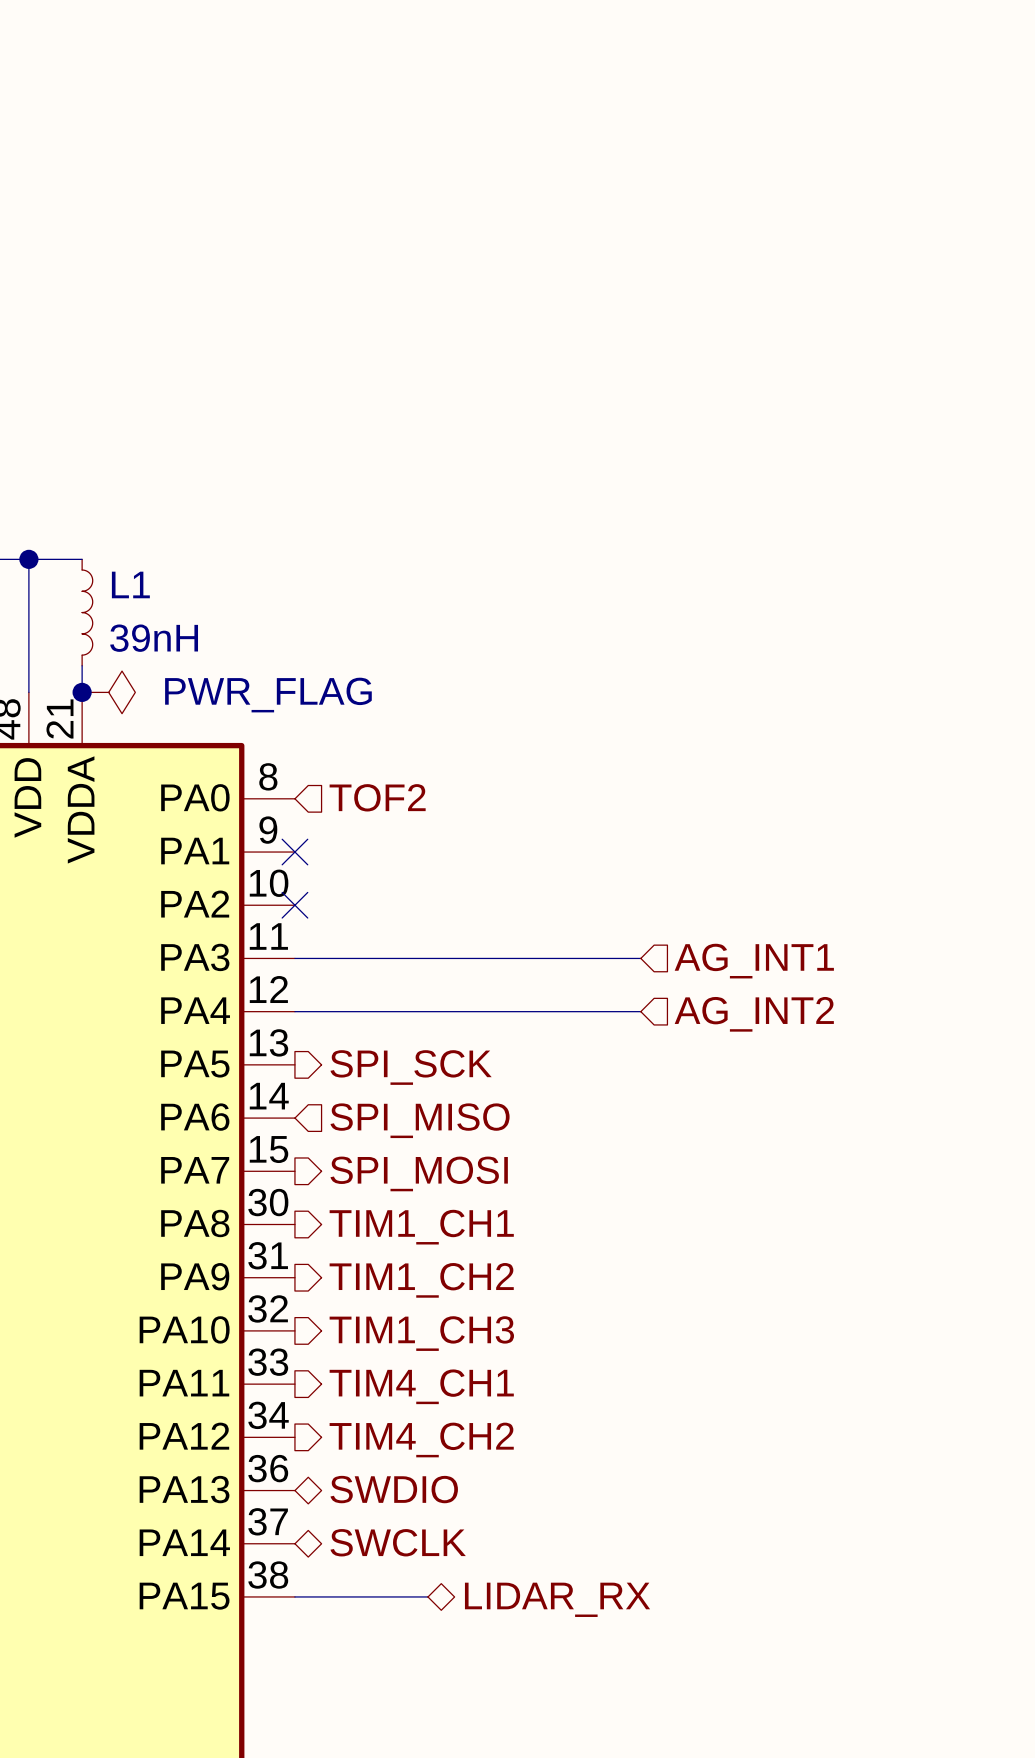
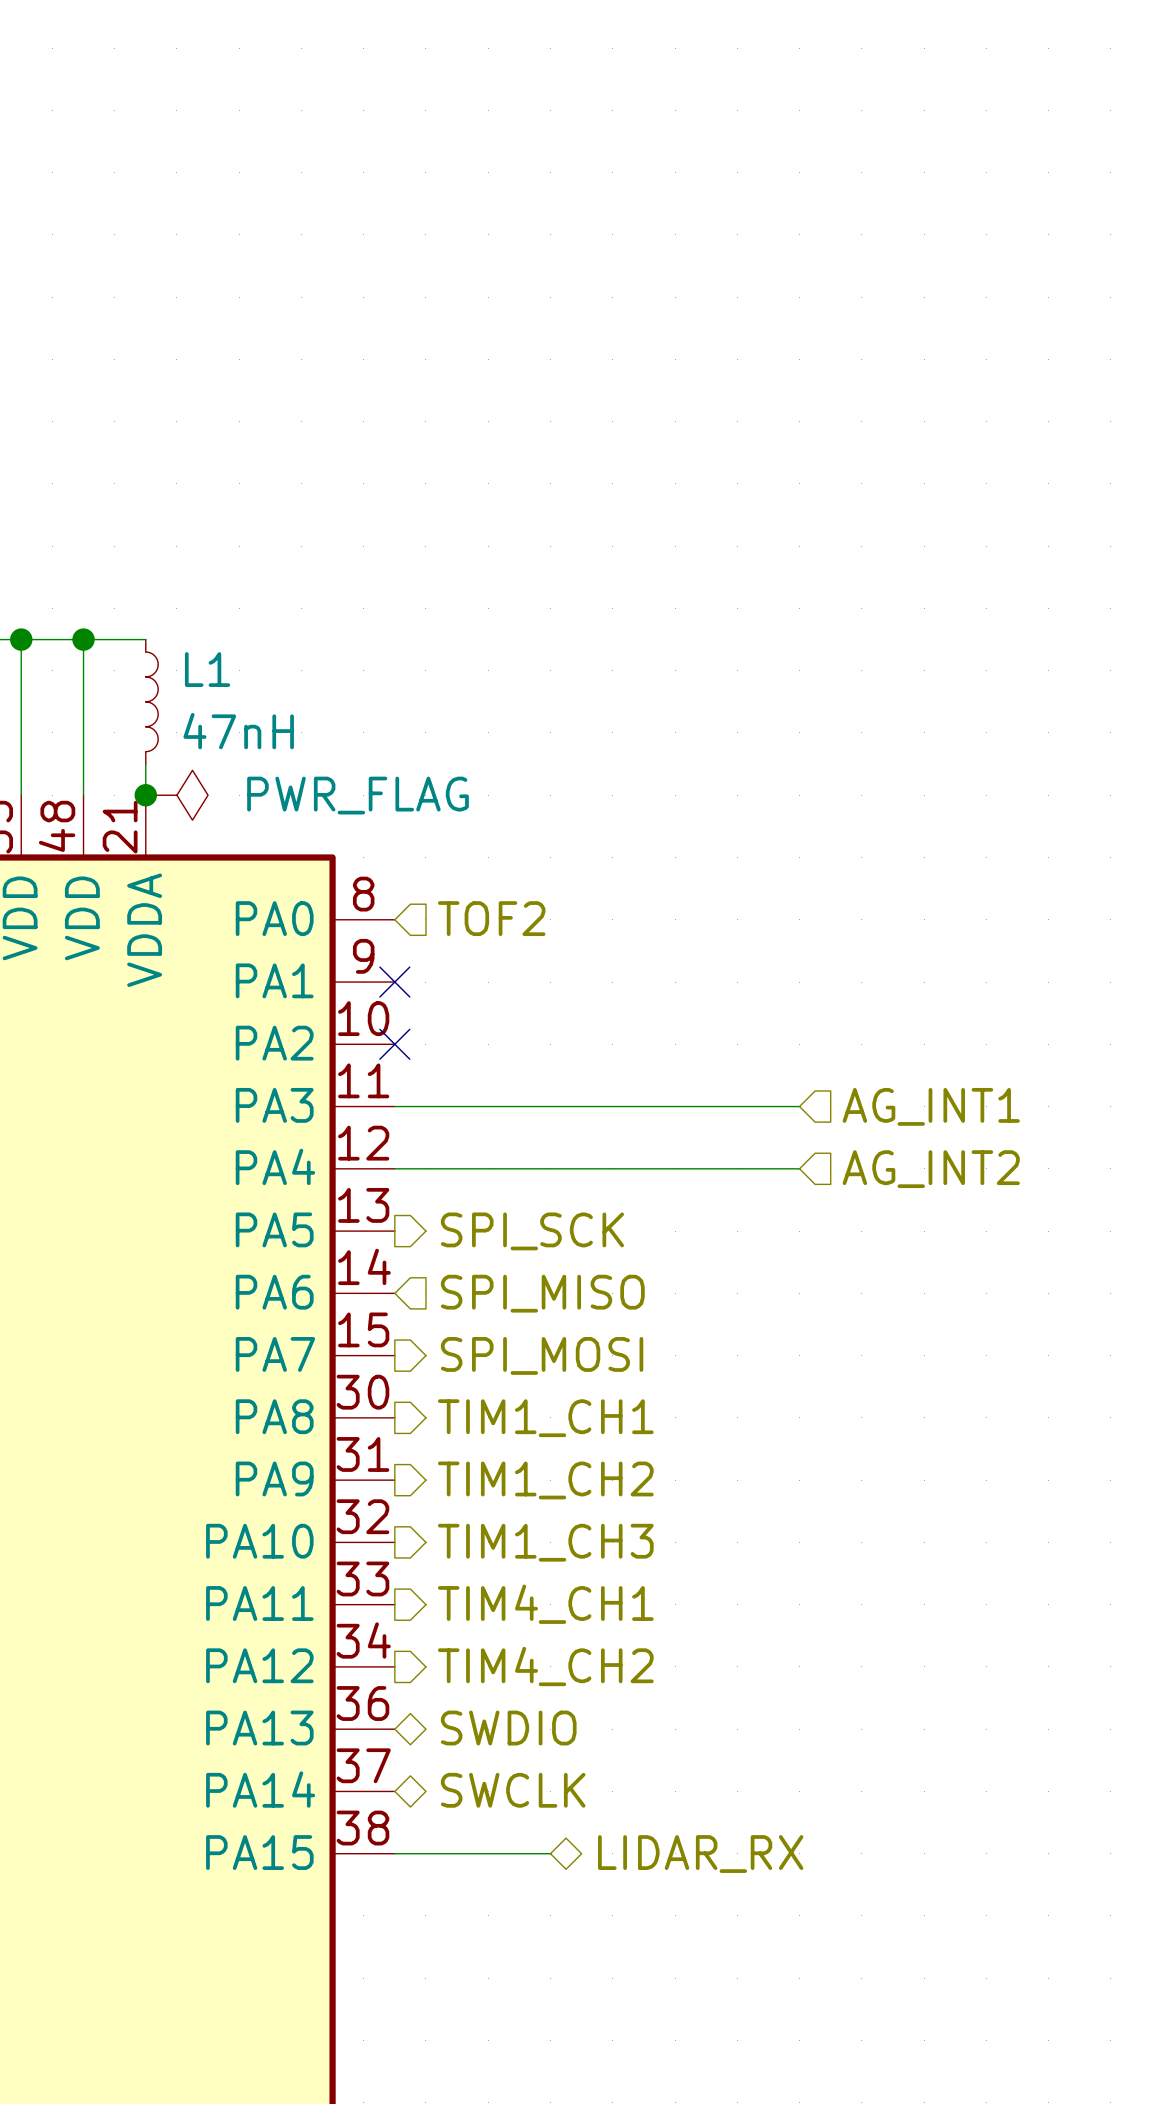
L1 value: 39nH (154, 638) -> 47nH (238, 731)

